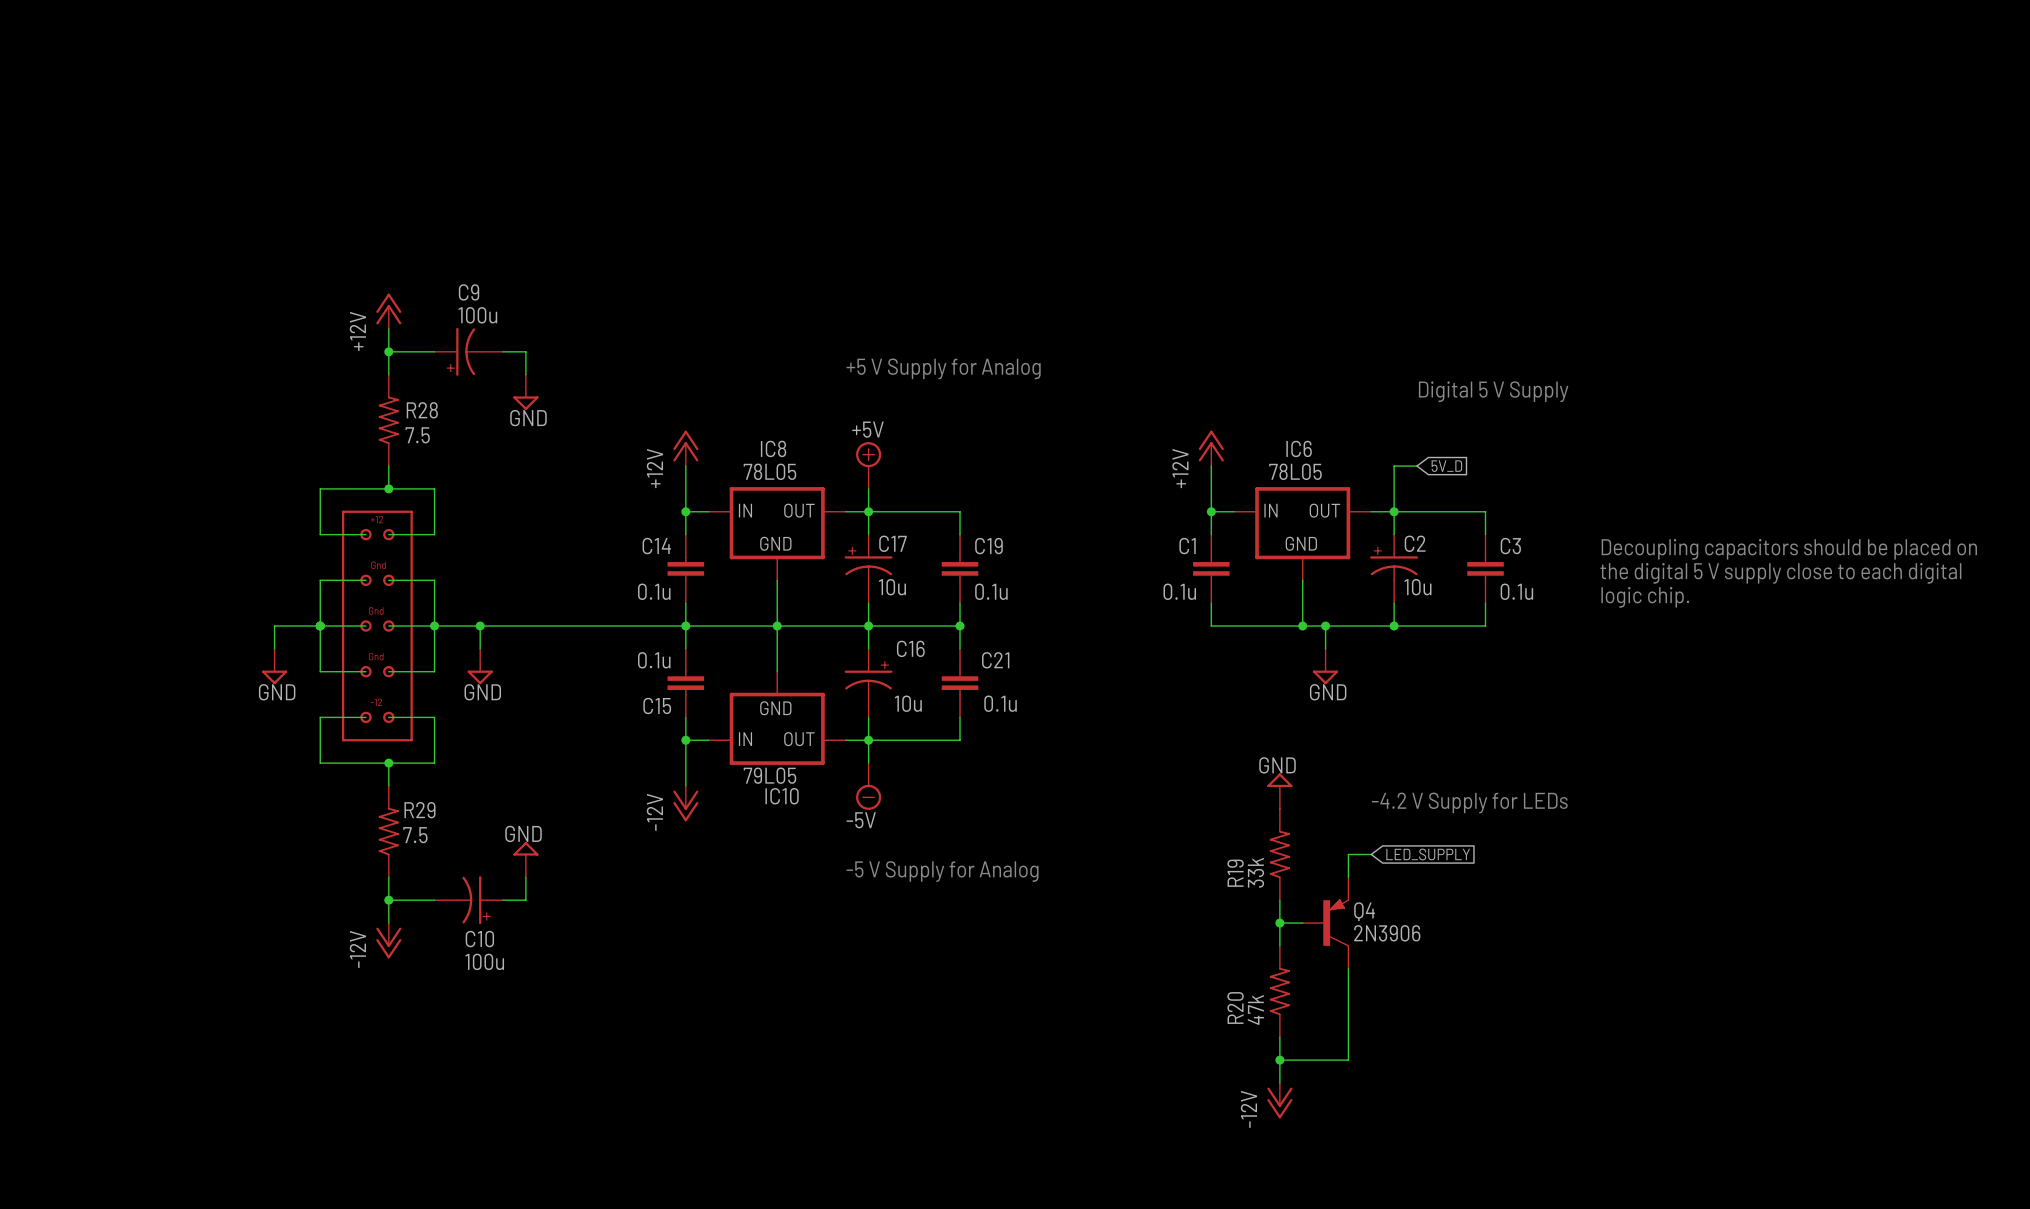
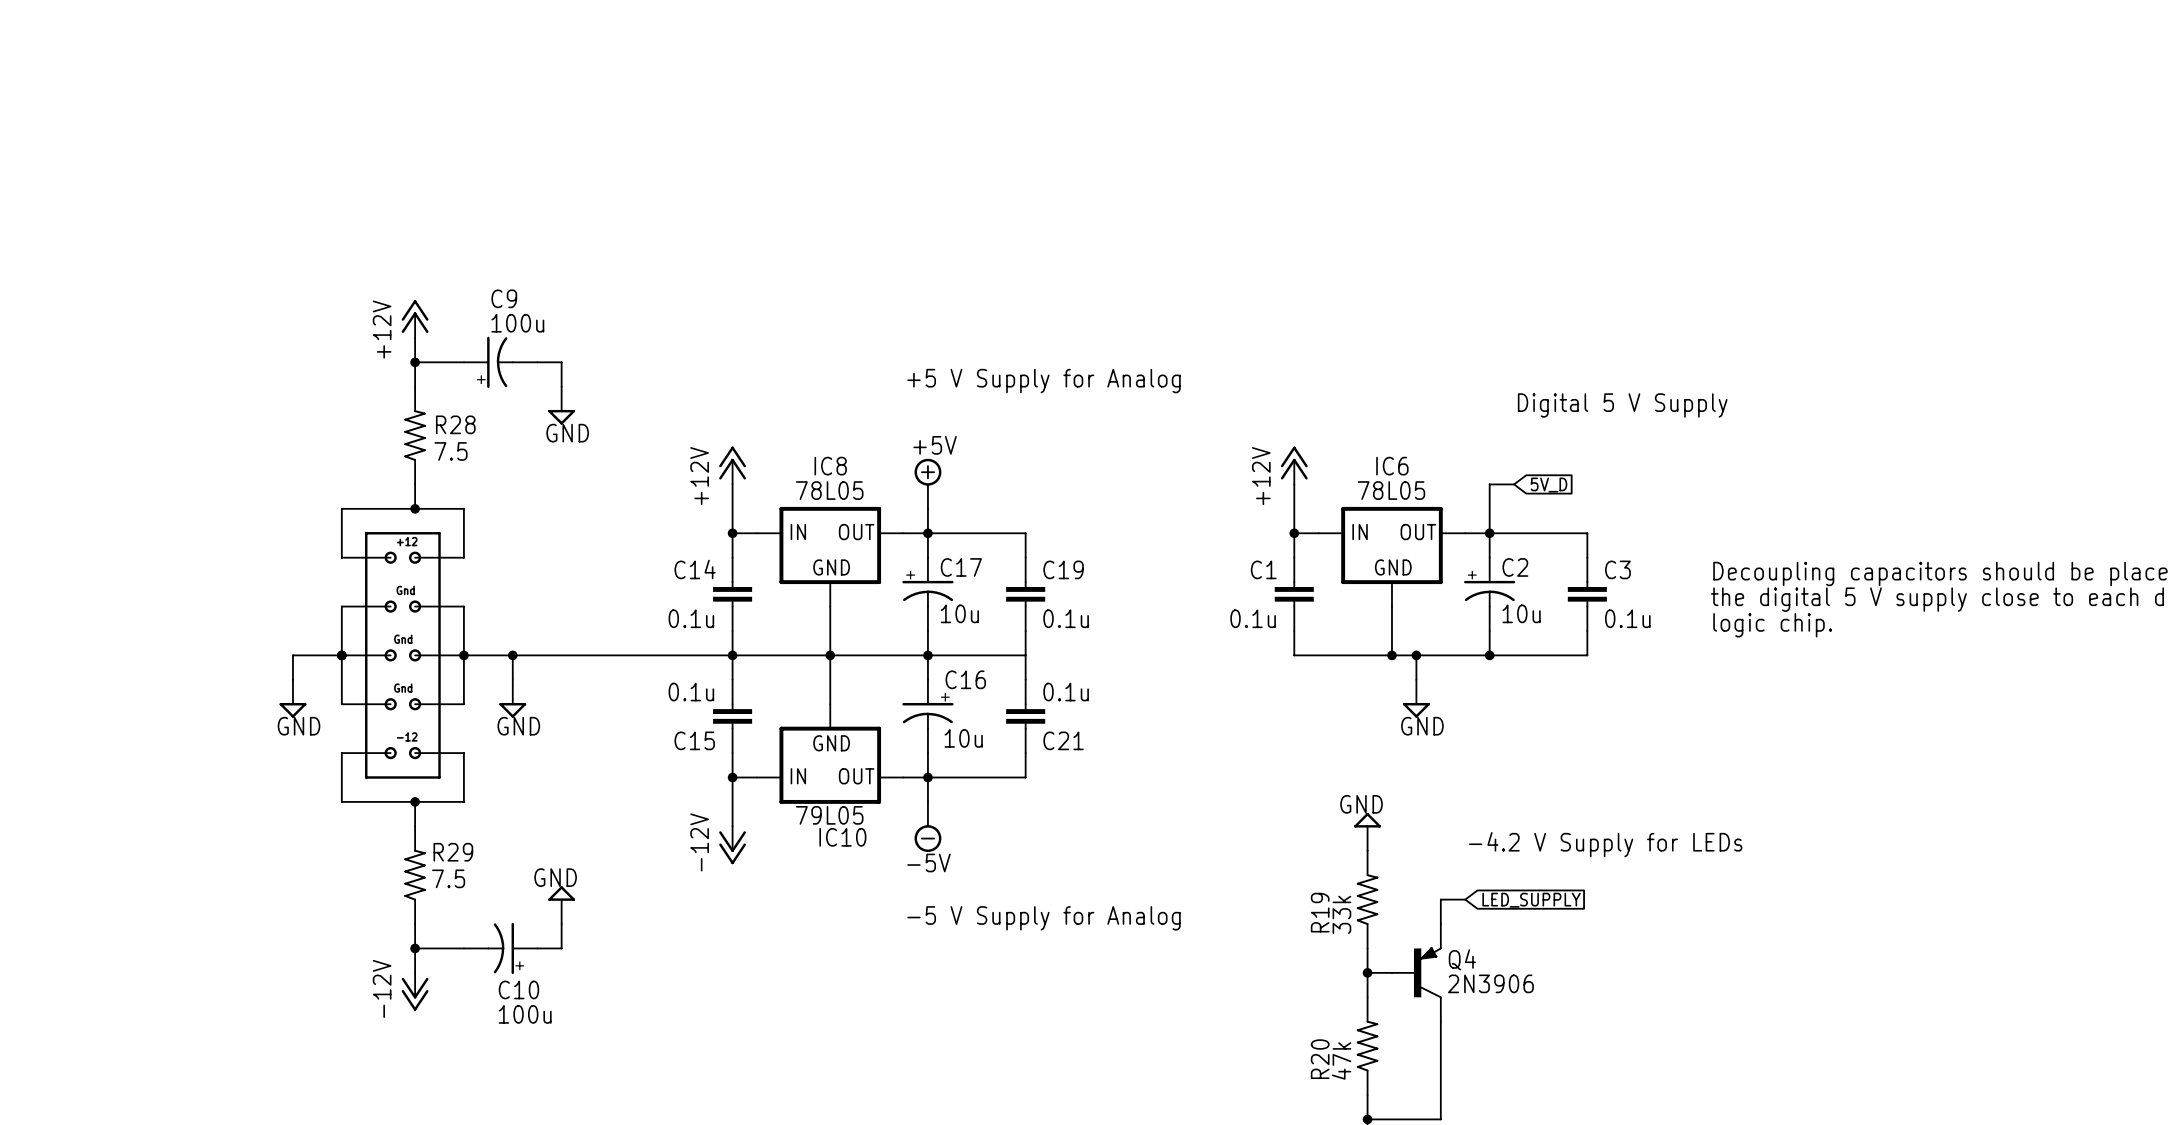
junction: (960, 626) -> none
C21 name position: C21 (995, 660) -> C21 (1063, 740)
C21 value position: 0.1u (1000, 703) -> 0.1u (1066, 692)

